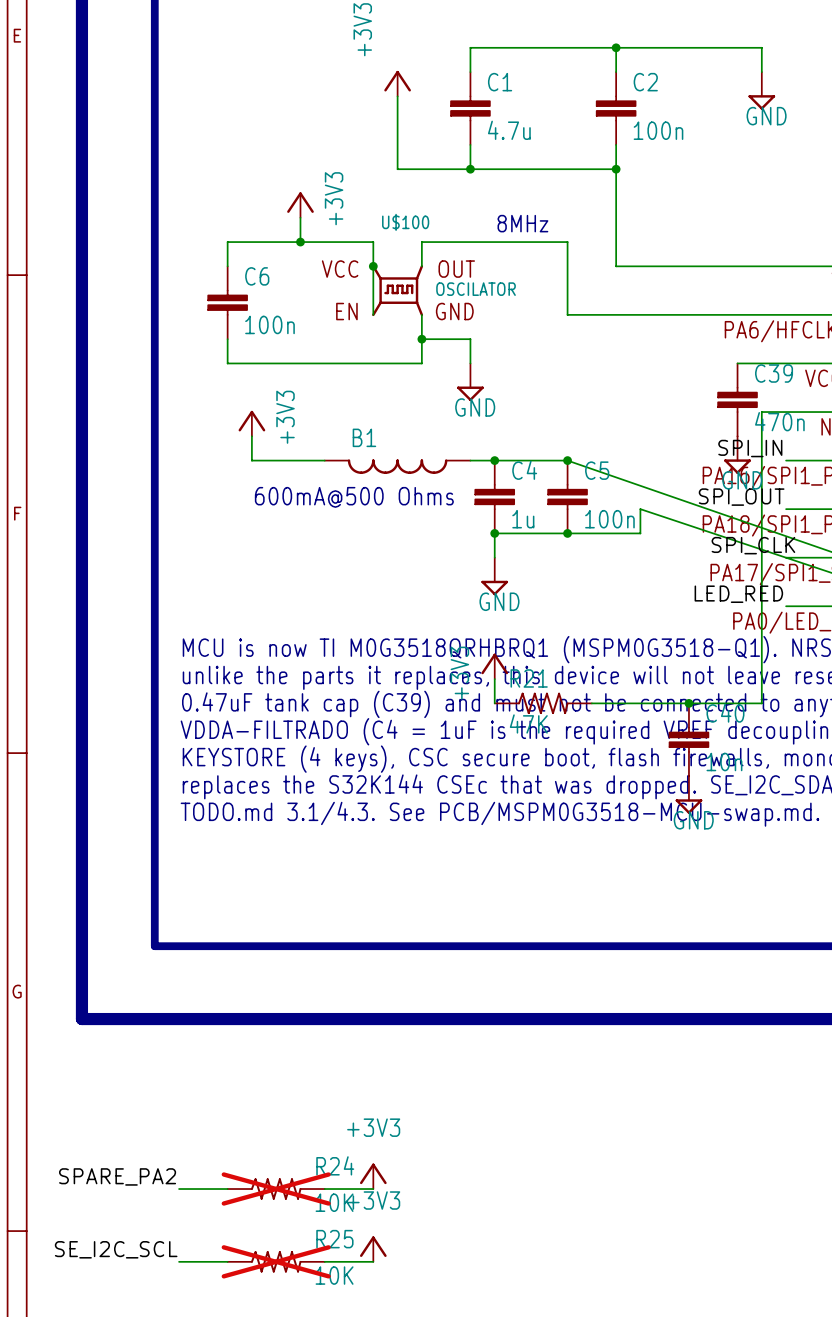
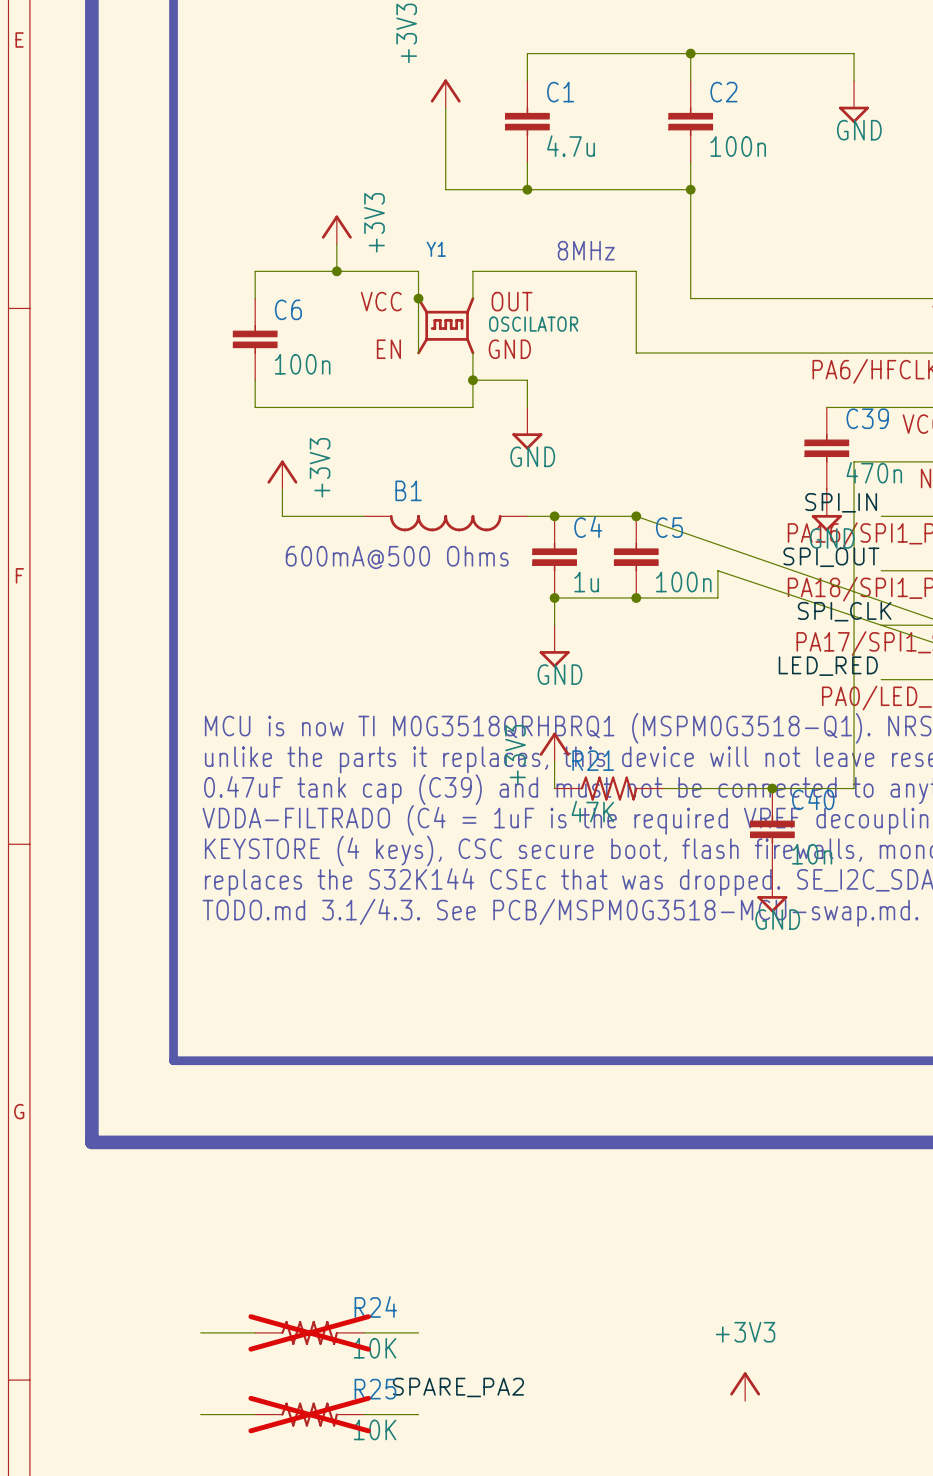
U$100 name: U$100 (405, 222) -> Y1 (436, 249)
label: SPARE_PA2 (117, 1176) -> none
power symbol: +3V3 (373, 1176) -> none
power symbol: none -> +3V3 (745, 1386)
label: none -> SPARE_PA2 (458, 1387)
label: SE_I2C_SCL (116, 1249) -> none
power symbol: +3V3 (373, 1249) -> none

